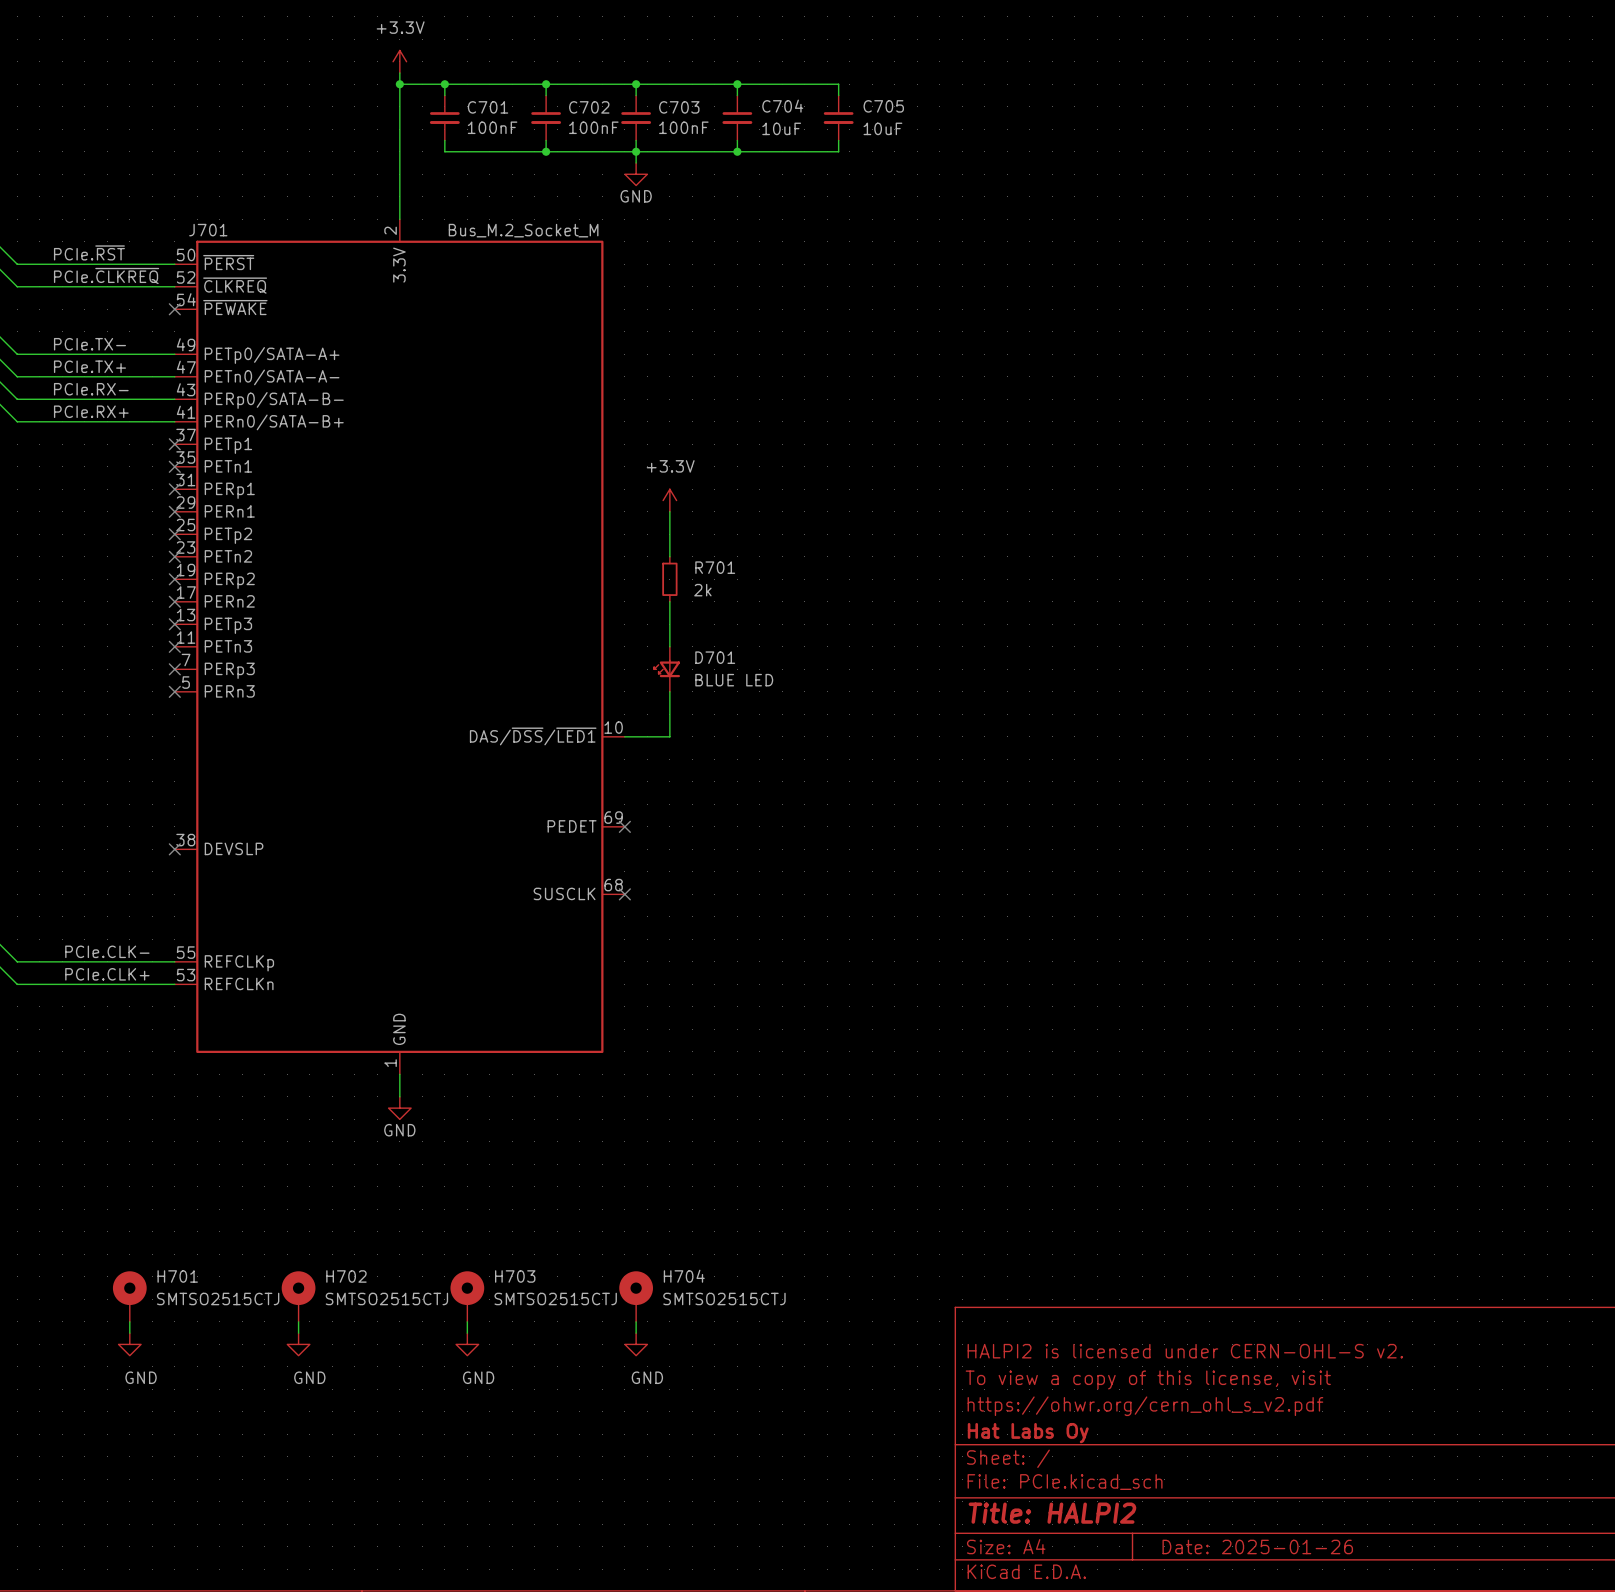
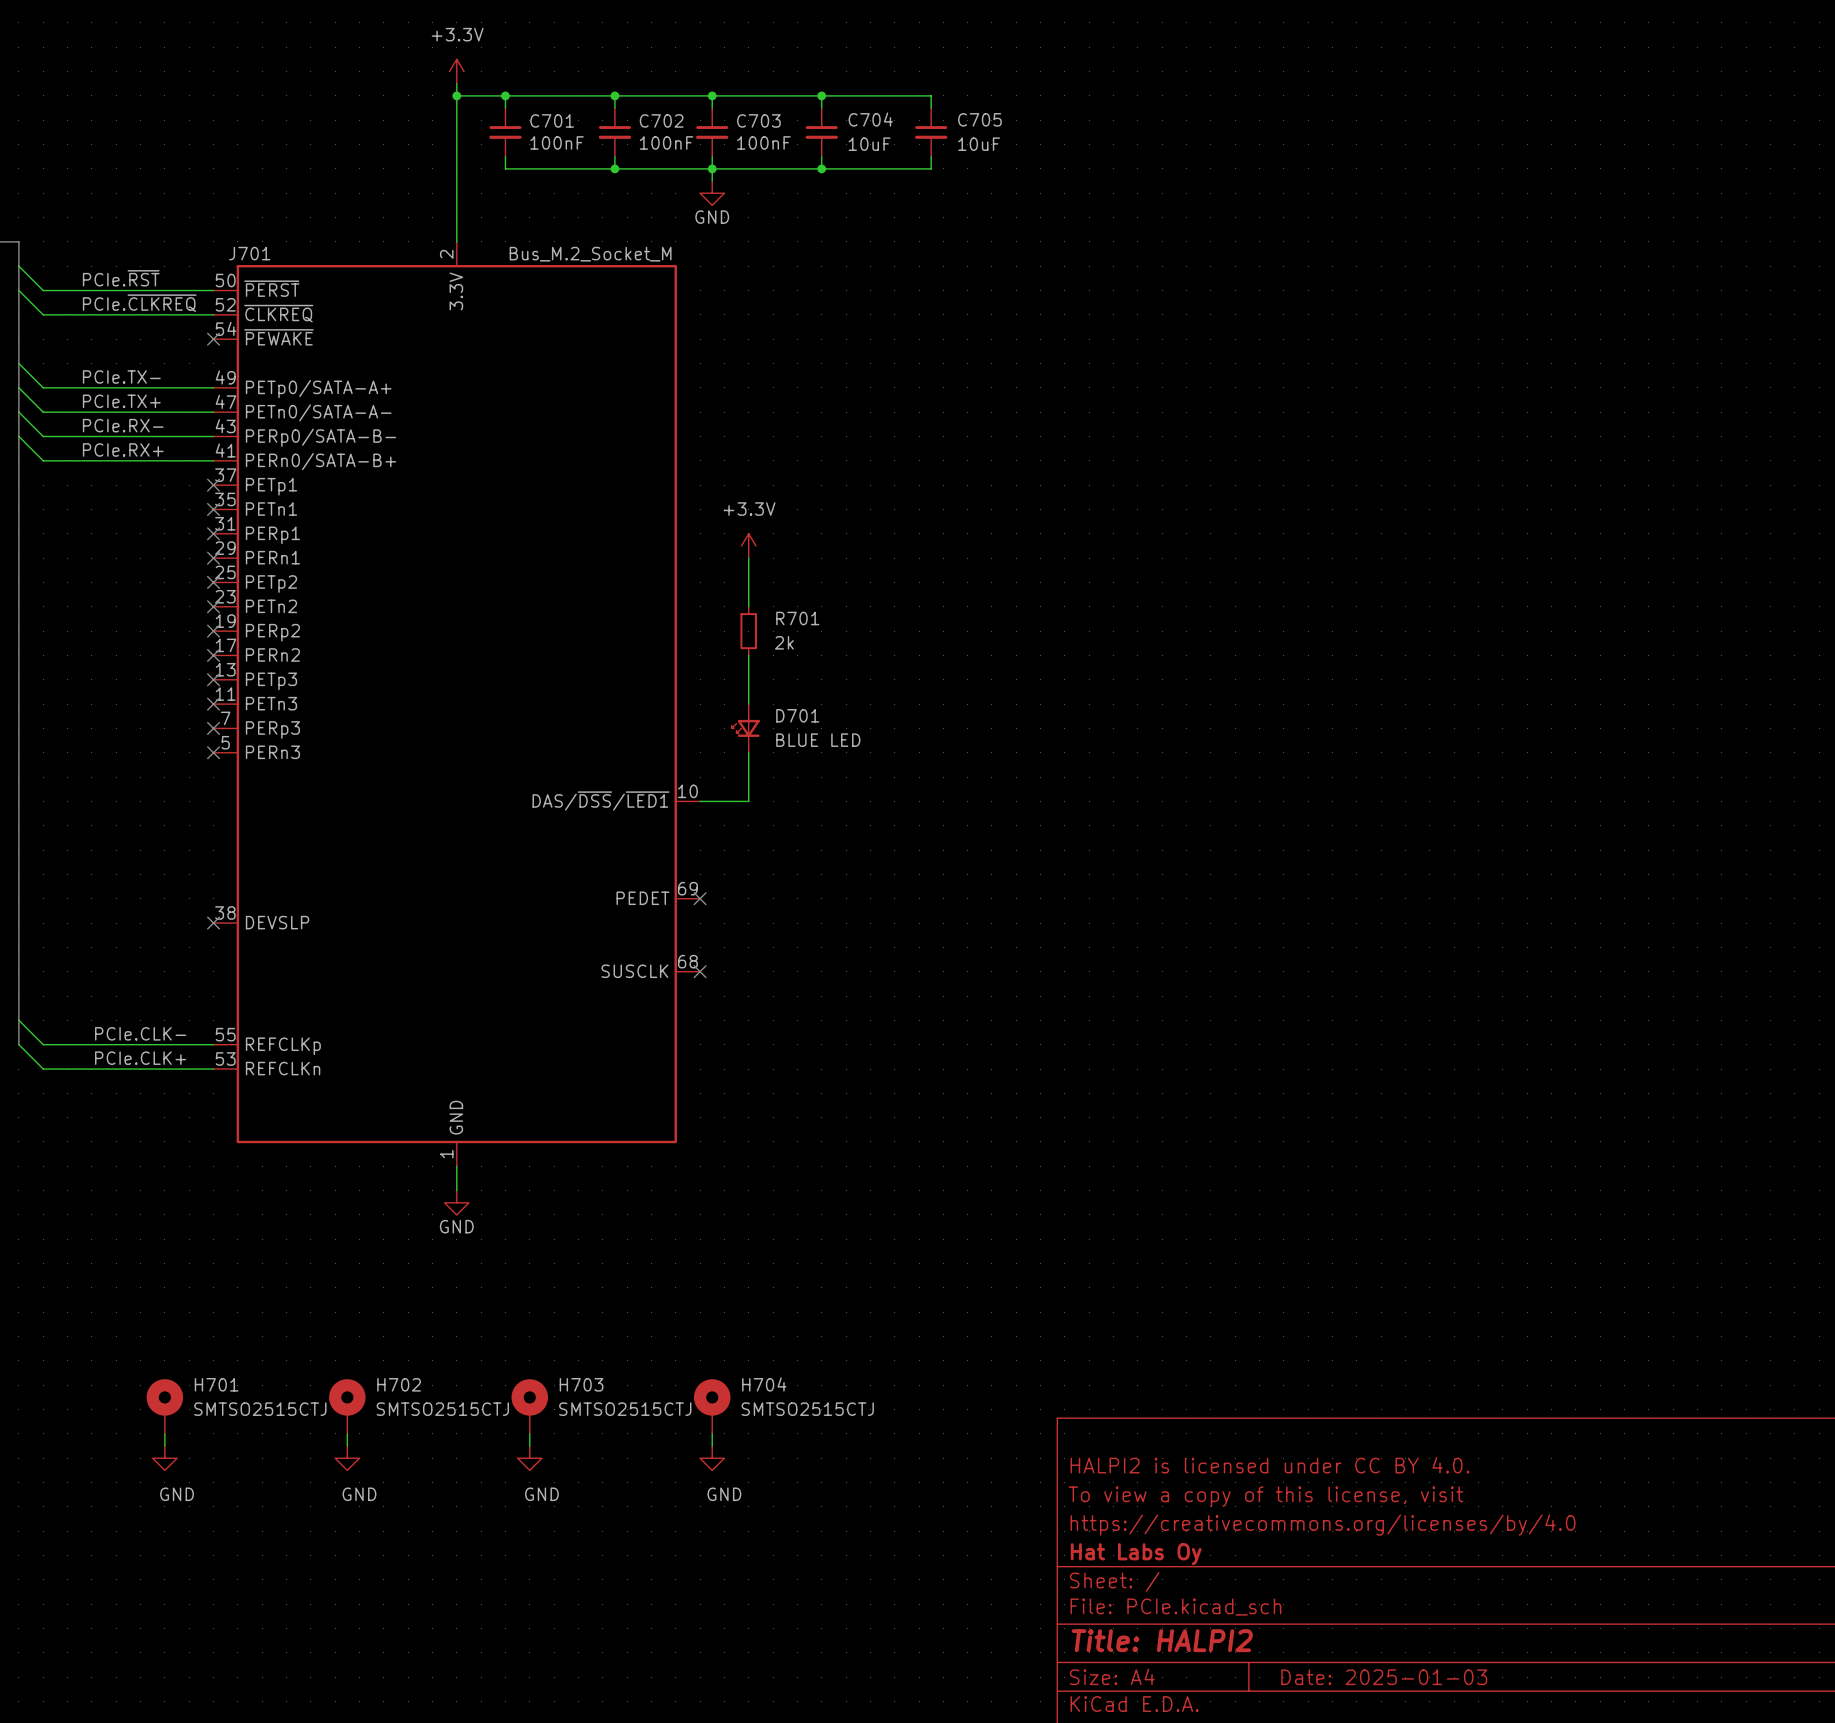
title block: HALPI2 is licensed under CERN-OHL-S v2. (1185, 1351) -> HALPI2 is licensed under CC BY 4.0. (1270, 1465)
title block: https://ohwr.org/cern_ohl_s_v2.pdf (1145, 1406) -> https://creativecommons.org/licenses/by/4.0 (1323, 1525)
title block: Date: 2025-01-26 (1257, 1546) -> Date: 2025-01-03 (1384, 1677)

